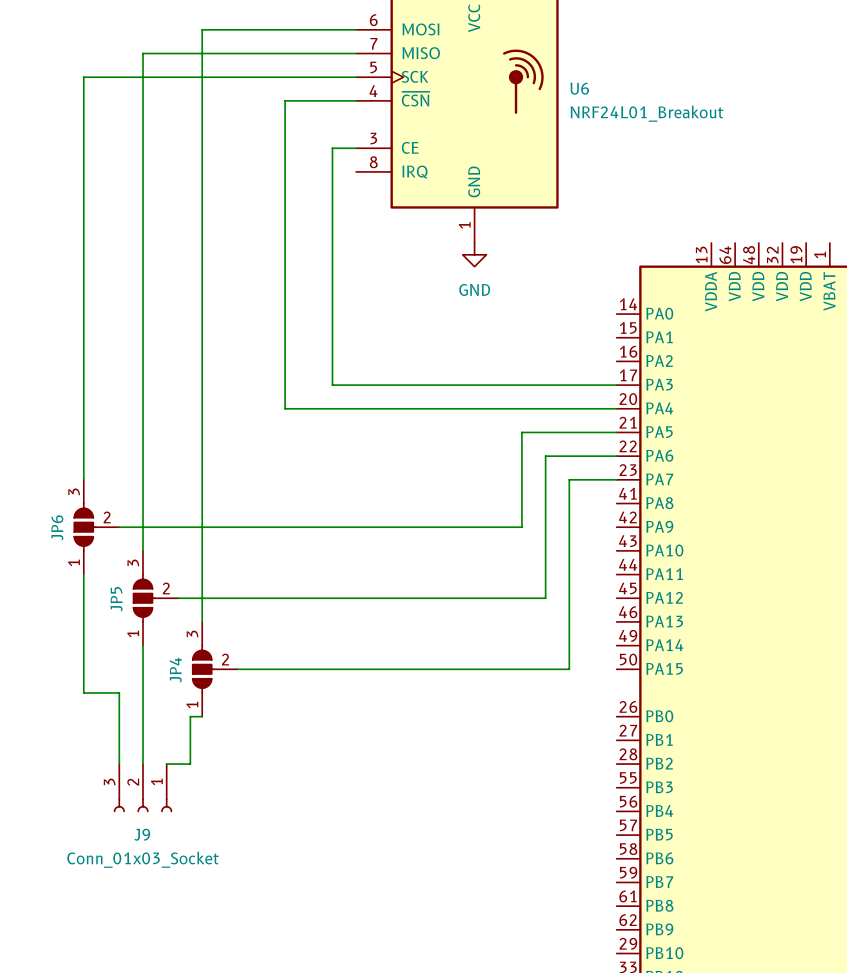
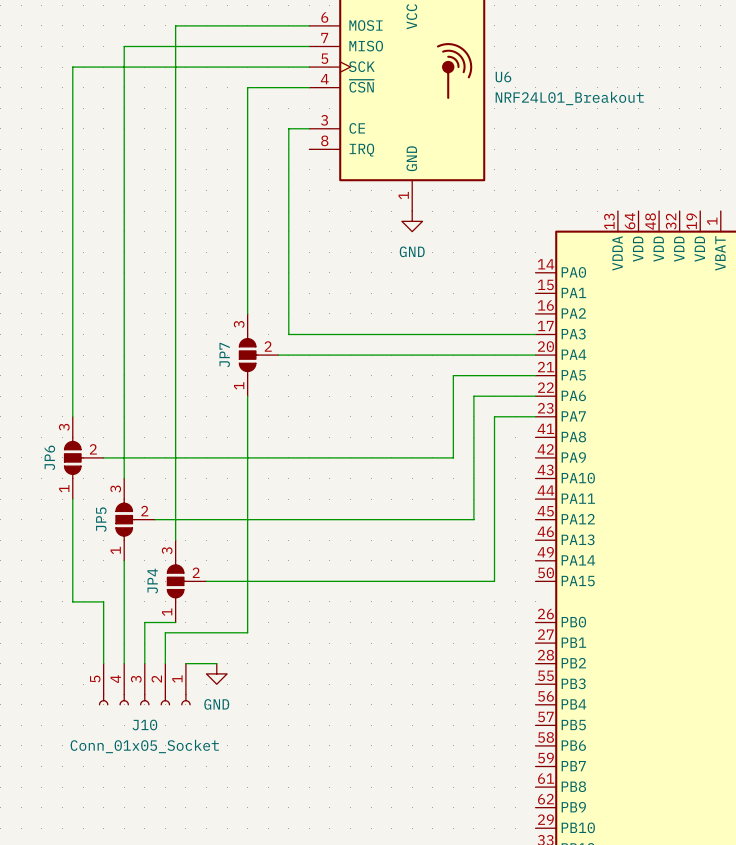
JP7: none -> (258, 355)
wire: none -> (247, 396) (247, 632) (165, 632)
wire: (190, 716) (190, 728) -> (165, 622) (144, 622) (144, 663)
wire: (166, 764) (190, 764) -> none
wire: none -> (185, 663) (216, 663)
power symbol: none -> GND (216, 673)
J9: Conn_01x03_Socket (142, 788) -> none
J10: none -> Conn_01x05_Socket (144, 684)

